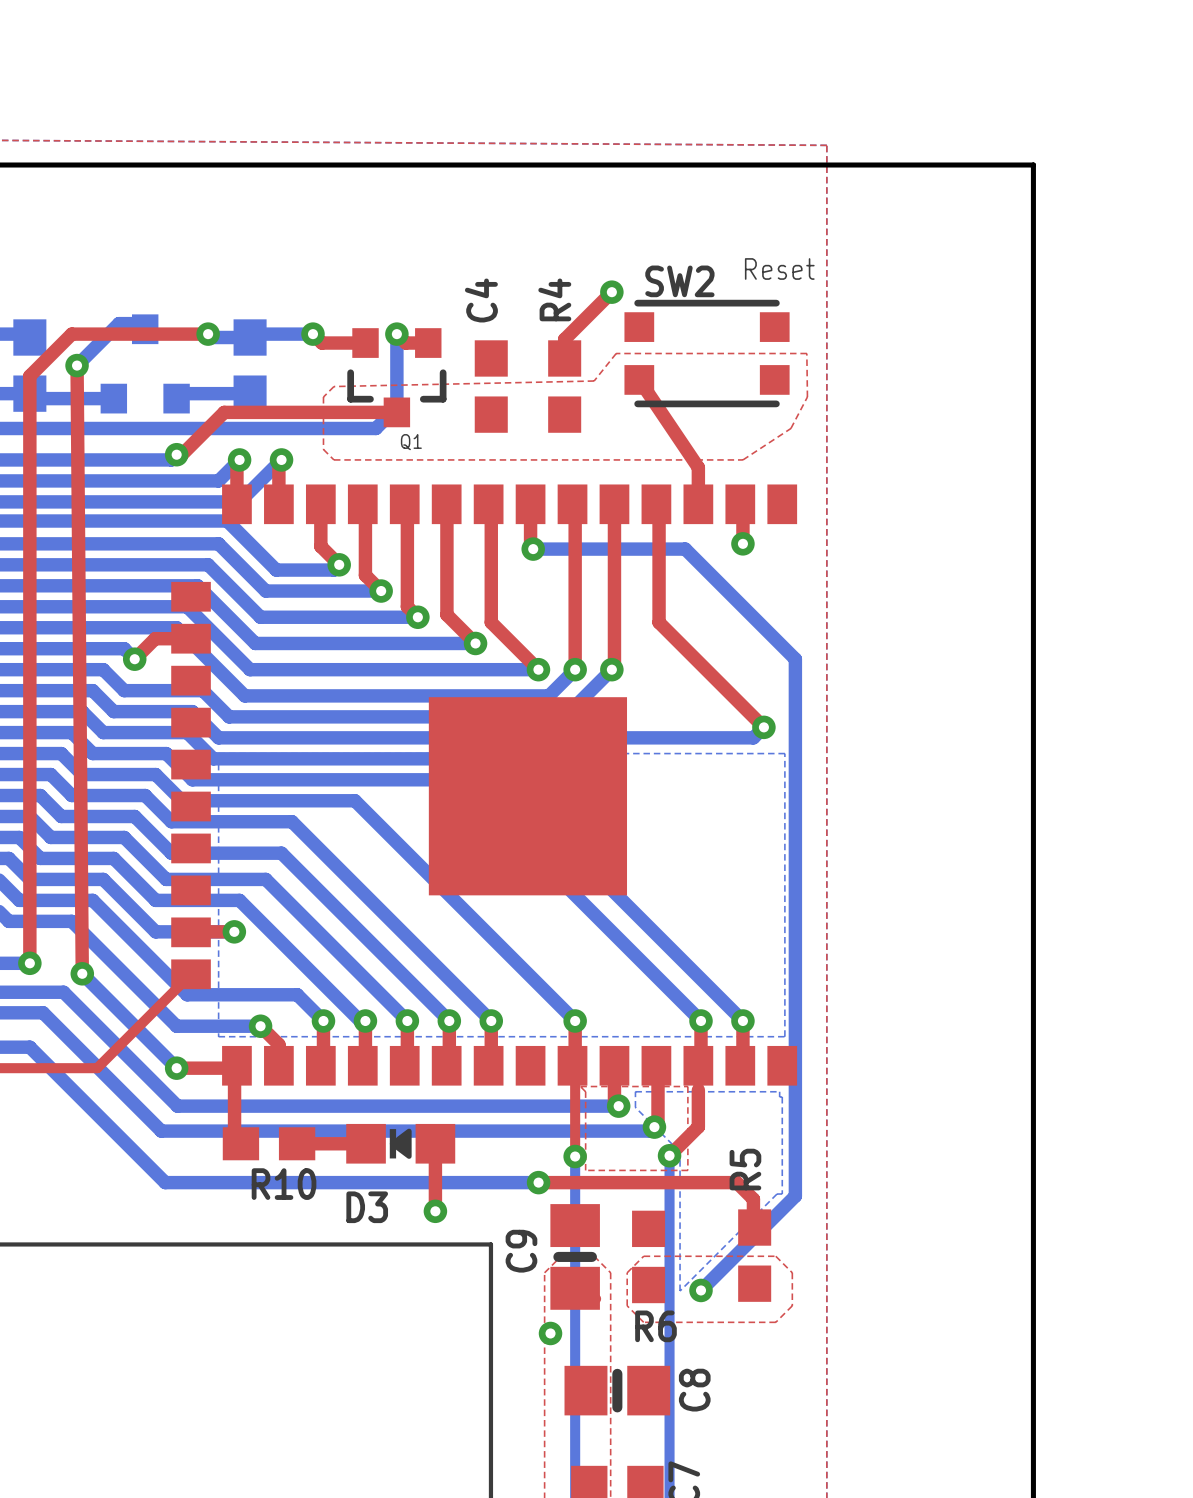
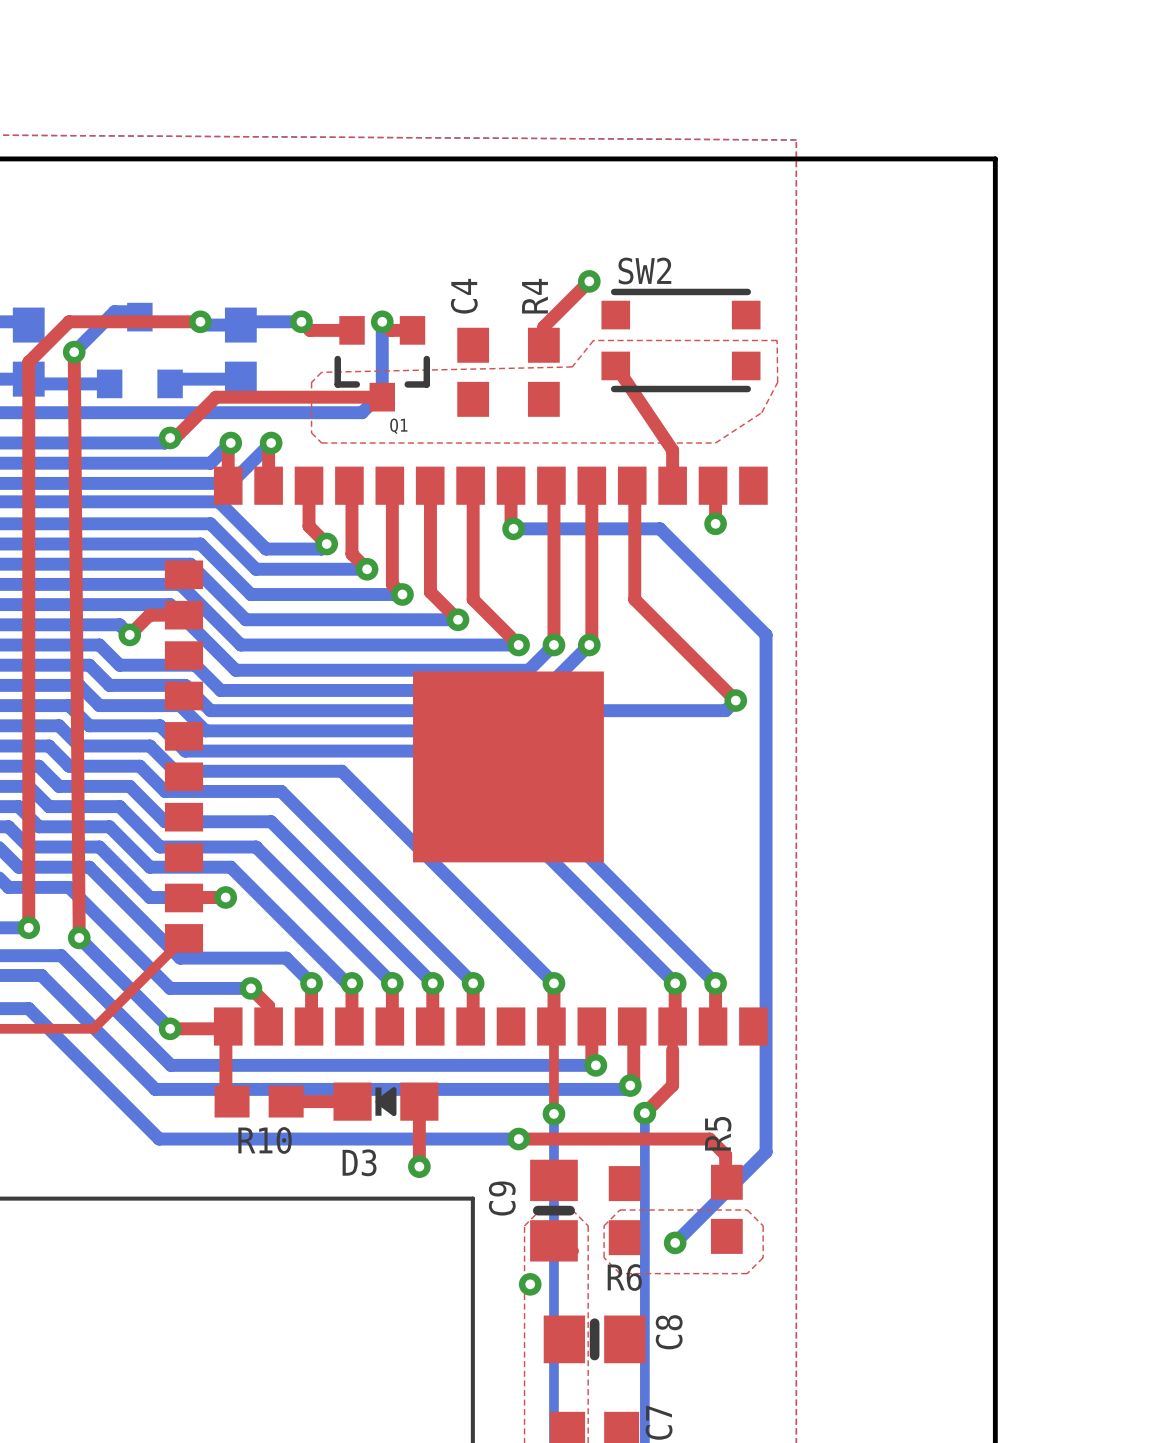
text: Reset (779, 268) -> none
bottom zone outline: (218, 753) (784, 753) (784, 1036) (218, 1036) (218, 753) -> none
top zone outline: (580, 1086) (687, 1086) (687, 1170) (585, 1170) (585, 1091) (580, 1086) -> none
bottom zone outline: (635, 1091) (779, 1091) (779, 1097) (782, 1097) (782, 1194) (777, 1194) (680, 1291) (680, 1152) (635, 1107) (635, 1091) -> none

